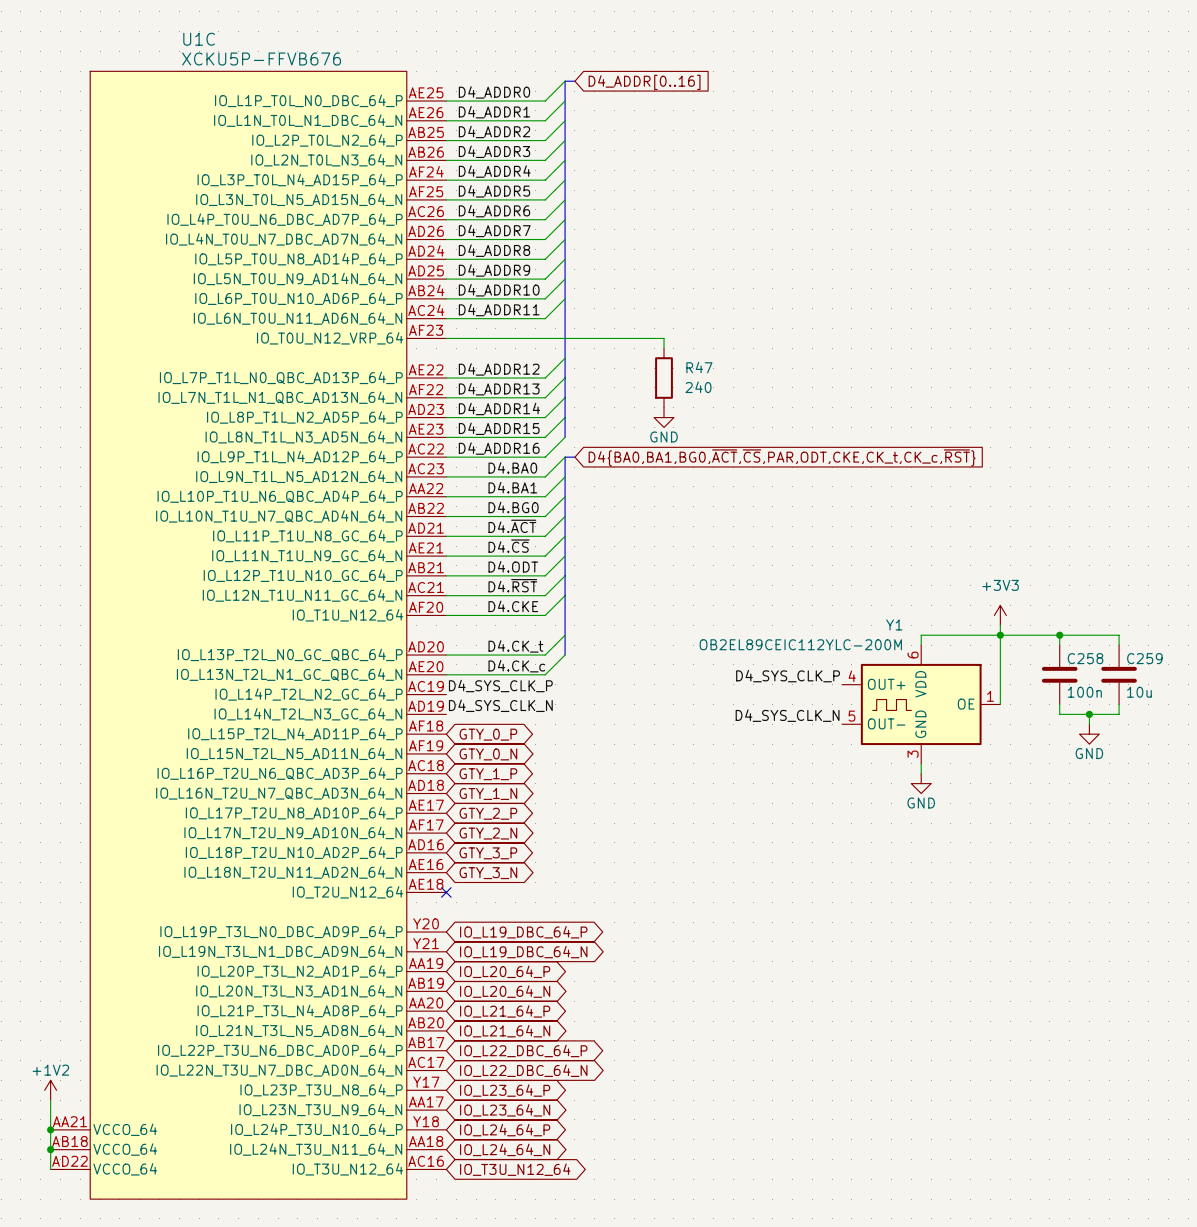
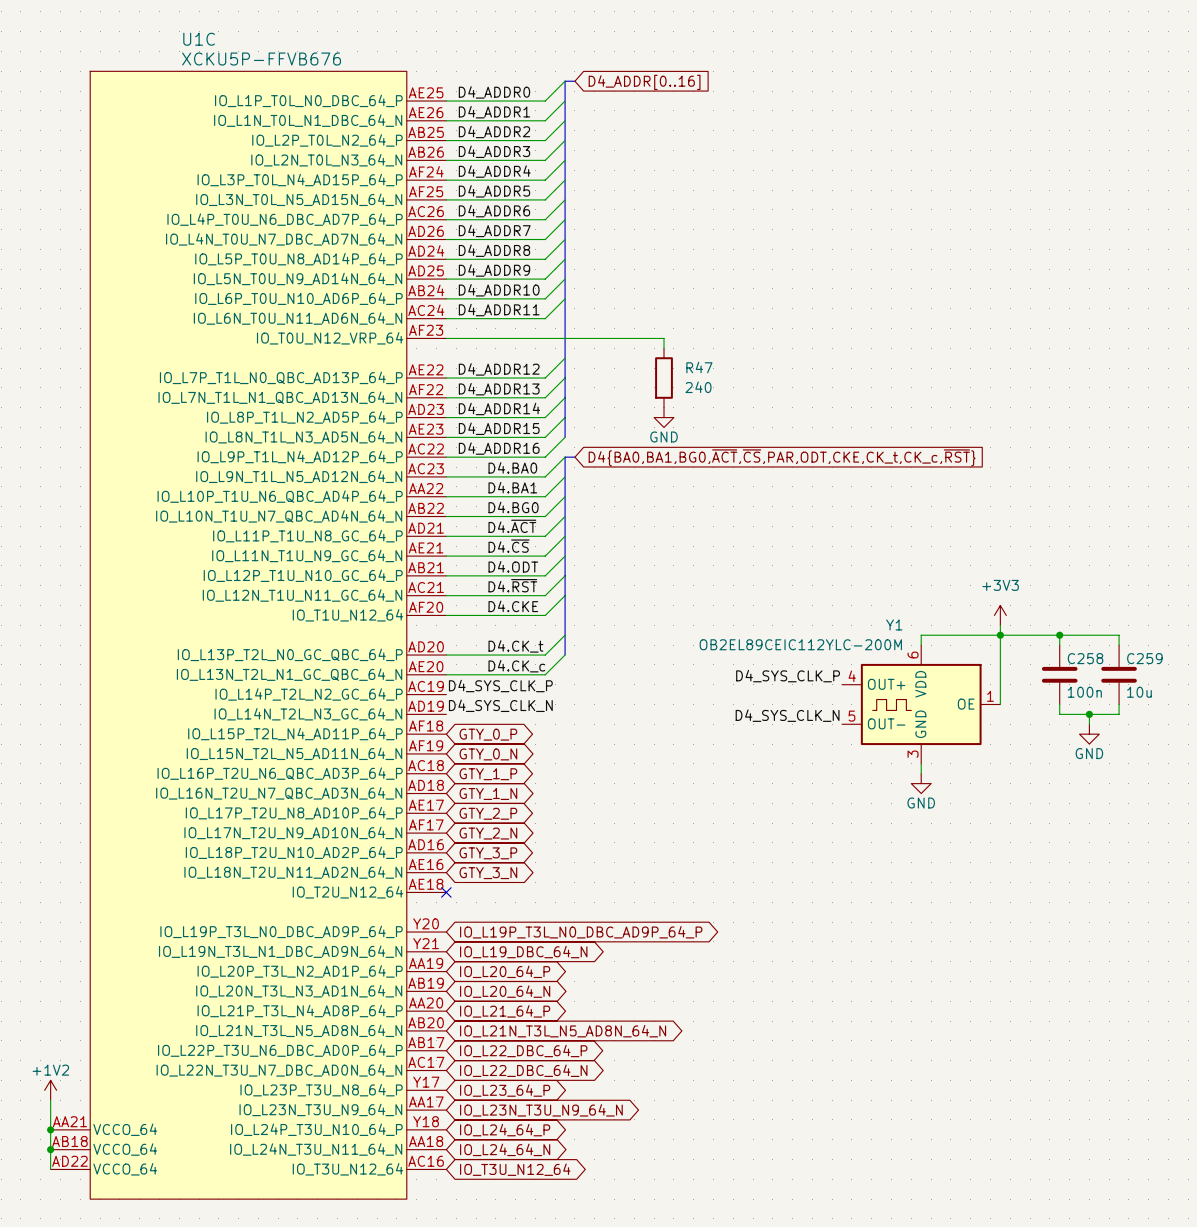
global label: IO_L19_DBC_64_P (523, 932) -> IO_L19P_T3L_N0_DBC_AD9P_64_P (581, 932)
global label: IO_L21_64_N (505, 1031) -> IO_L21N_T3L_N5_AD8N_64_N (563, 1031)
global label: IO_L23_64_N (505, 1110) -> IO_L23N_T3U_N9_64_N (541, 1110)

